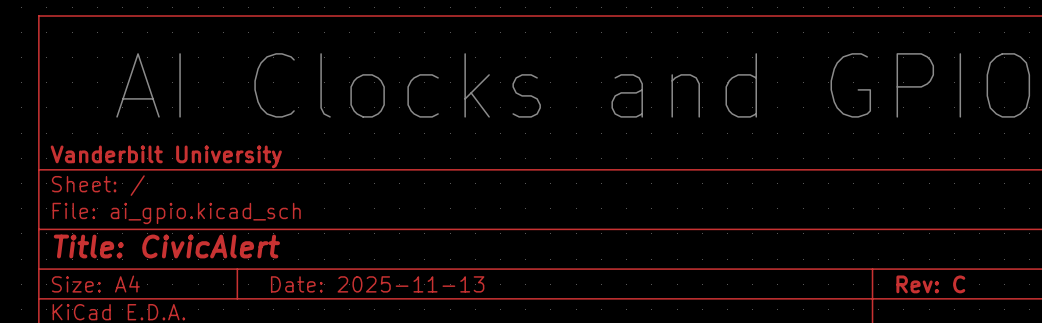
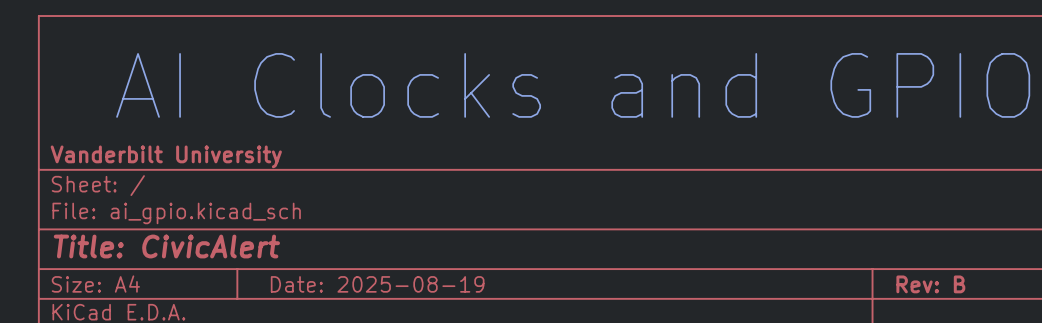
title block: Date: 2025-11-13 (377, 284) -> Date: 2025-08-19 (377, 284)
title block: Rev: C (930, 284) -> Rev: B (930, 284)

